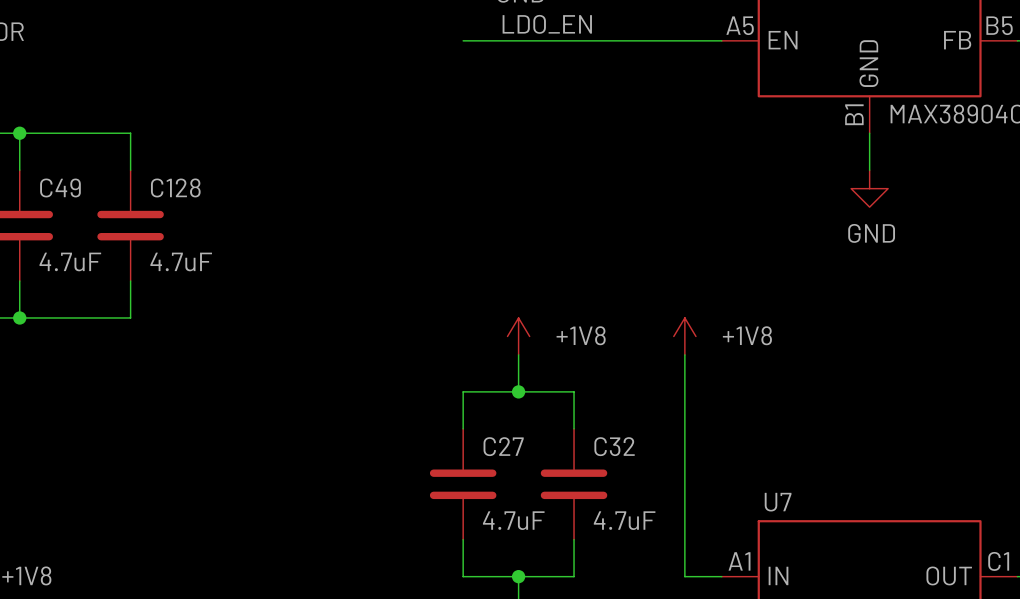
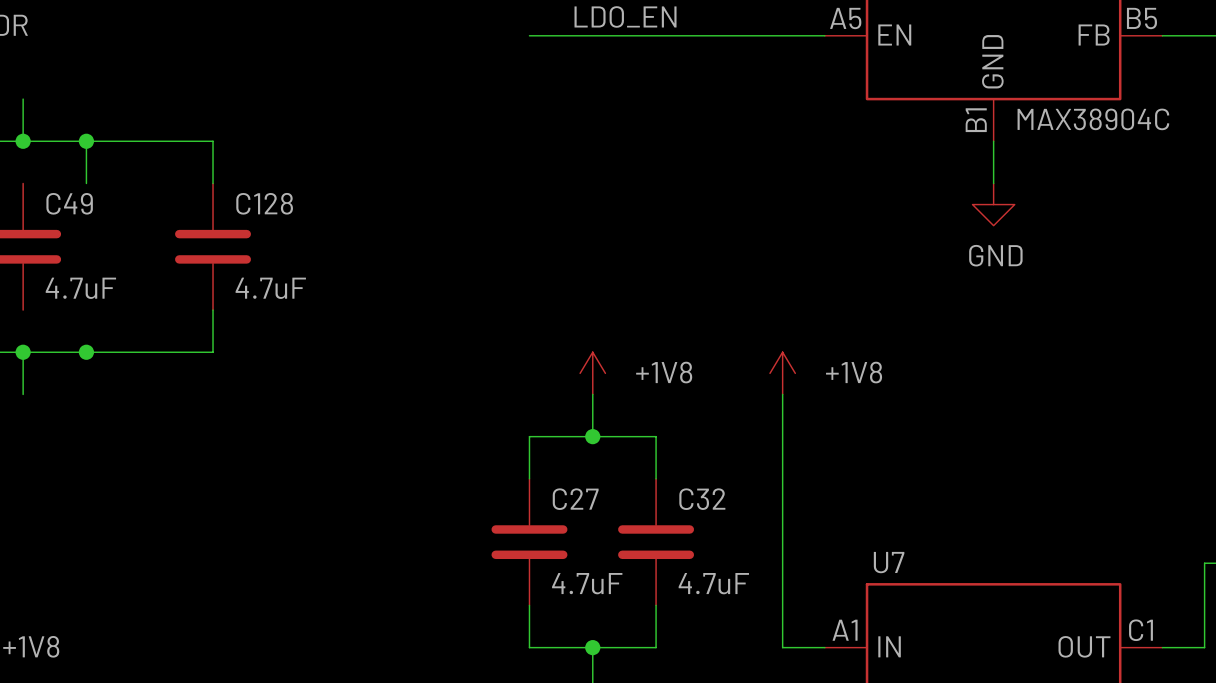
wire: (19, 133) (19, 170) -> (23, 141) (23, 99)
wire: none -> (86, 141) (86, 183)
junction: none -> (86, 141)
wire: (130, 133) (130, 170) -> (149, 141) (213, 141) (213, 183)
C128 position: (130, 225) -> (213, 246)
wire: (19, 281) (19, 317) -> (23, 394) (23, 352)
wire: (130, 281) (130, 317) -> (213, 310) (213, 352) (149, 352)
junction: none -> (86, 352)

